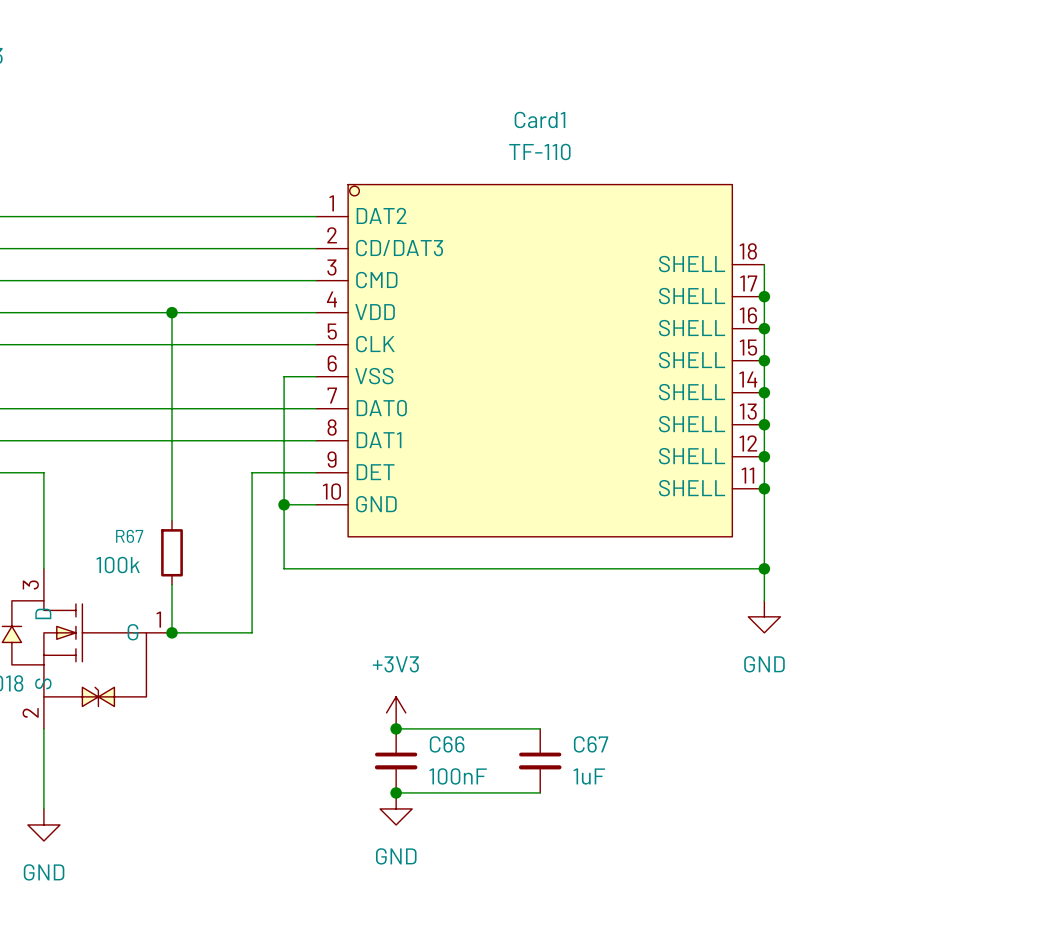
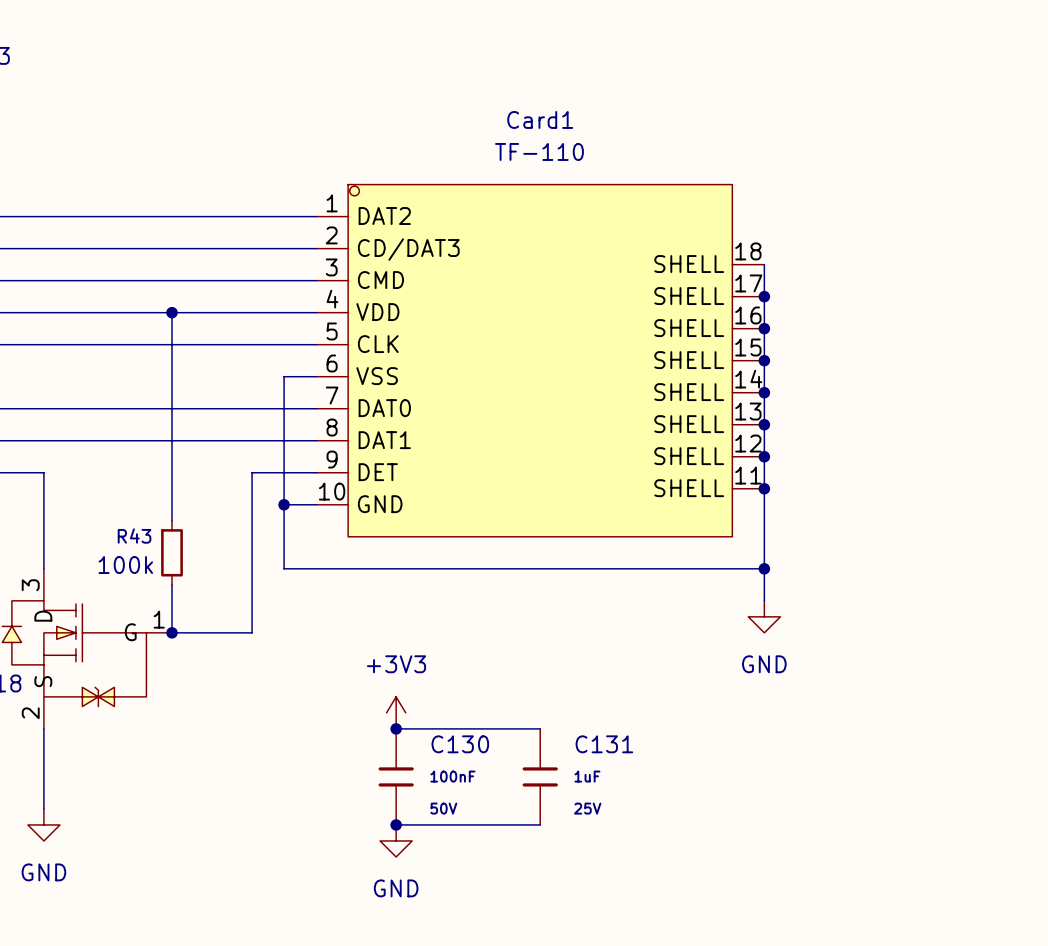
R67 name: R67 (129, 536) -> R43 (134, 536)
C66: 100nF (396, 760) -> none
C67: 1uF (540, 760) -> none
C130: none -> 100nF (396, 776)
C131: none -> 1uF (540, 776)
wire: (396, 792) (540, 792) -> (396, 824) (540, 824)
junction position: (396, 792) -> (396, 824)
power symbol position: GND (396, 808) -> GND (396, 840)

